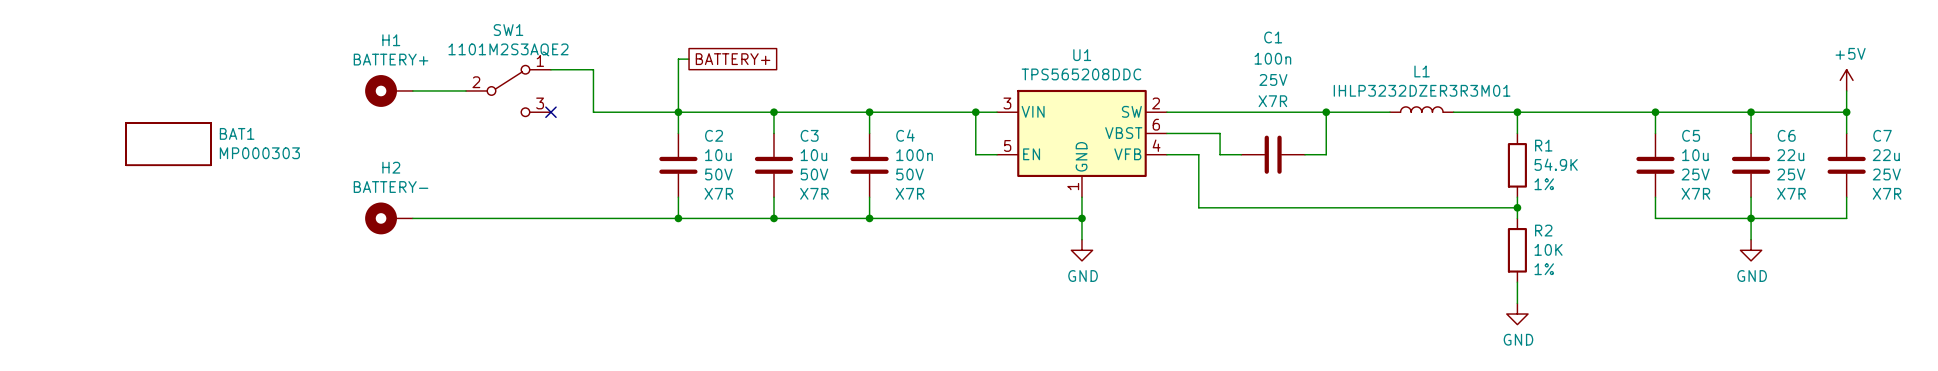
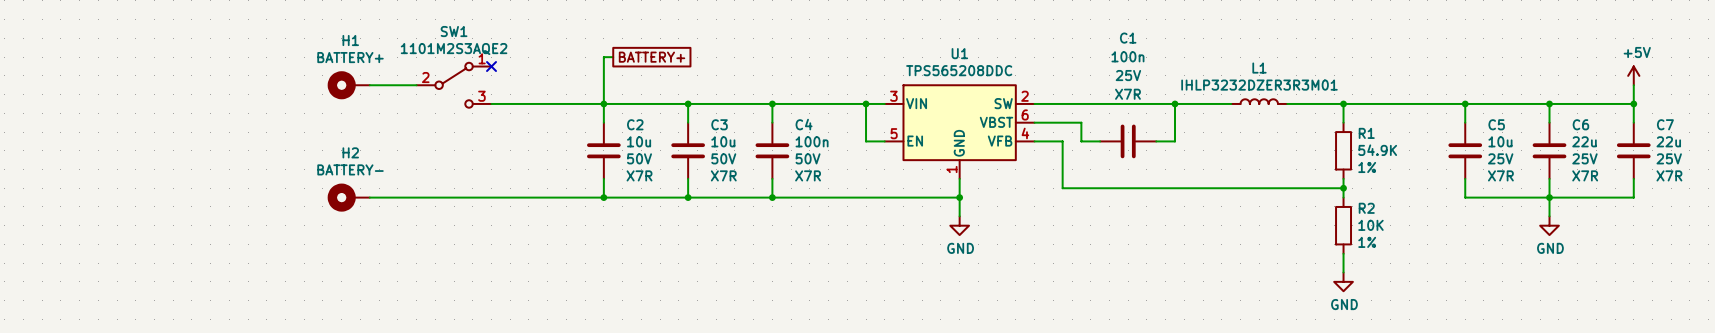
wire: (550, 69) (593, 69) (593, 112) -> (491, 103) (528, 103)
no-connect mark position: (550, 112) -> (491, 66)
BAT1: MP000303 (168, 144) -> none

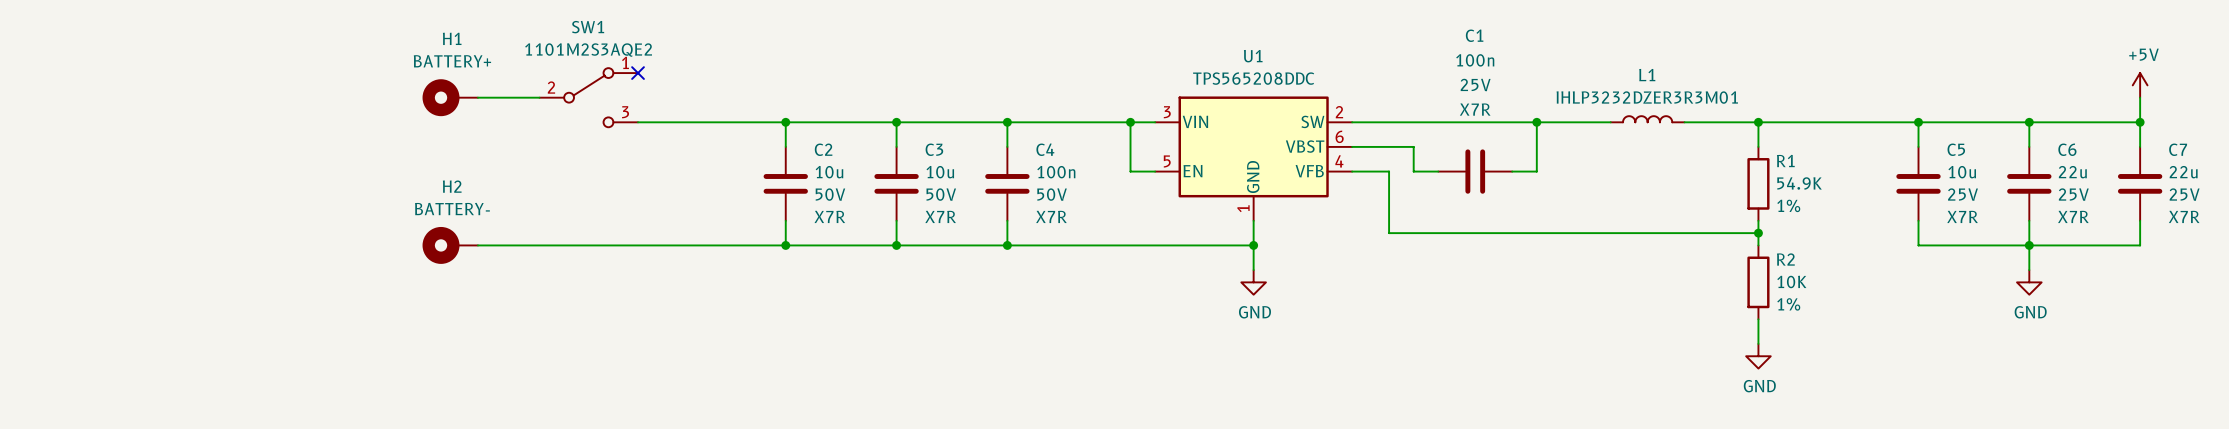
wire: (613, 57) (603, 57) (603, 103) -> none
global label: BATTERY+ (652, 57) -> none

